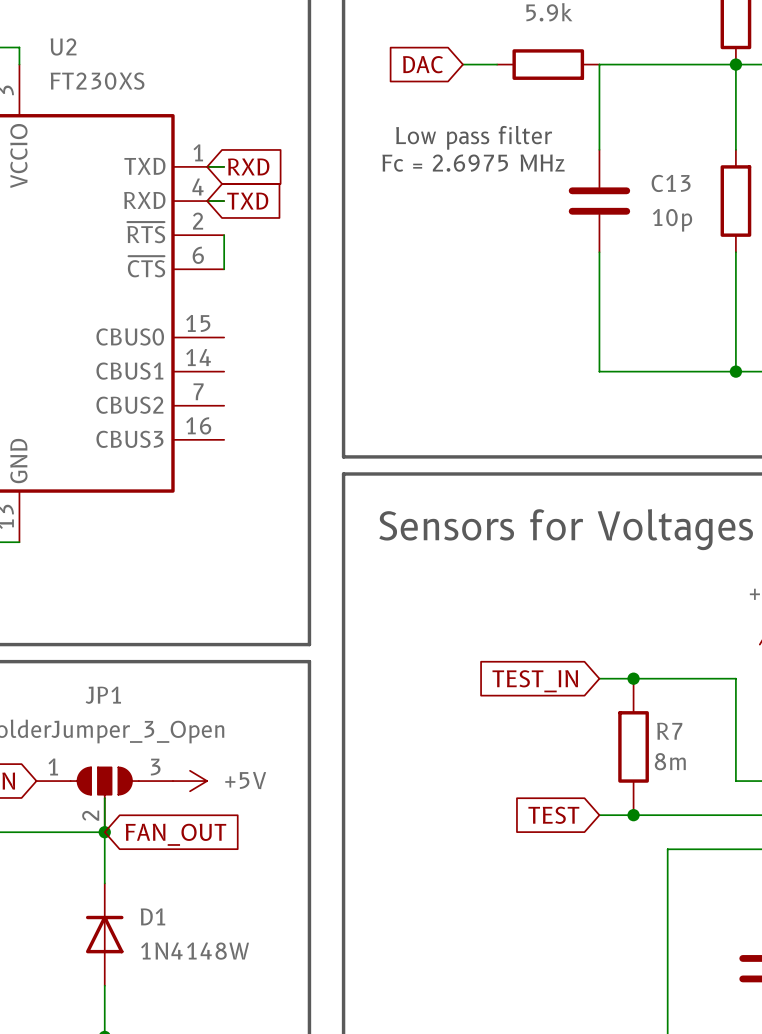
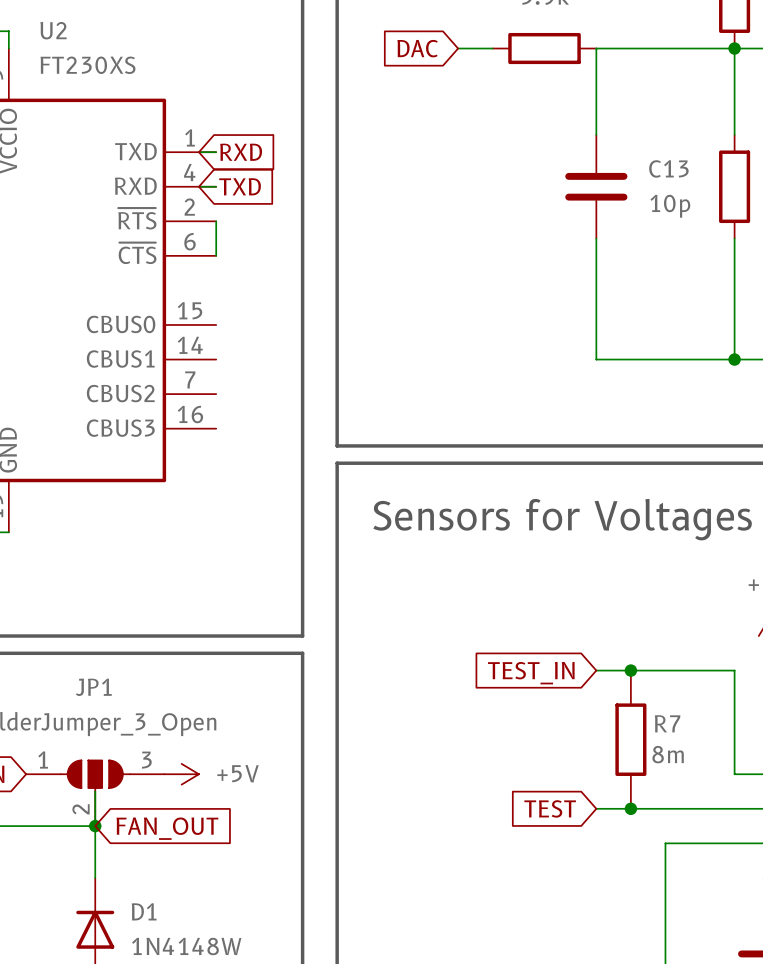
text: Low pass filter (474, 137) -> none
text: Fc = 2.6975 MHz (473, 163) -> none

